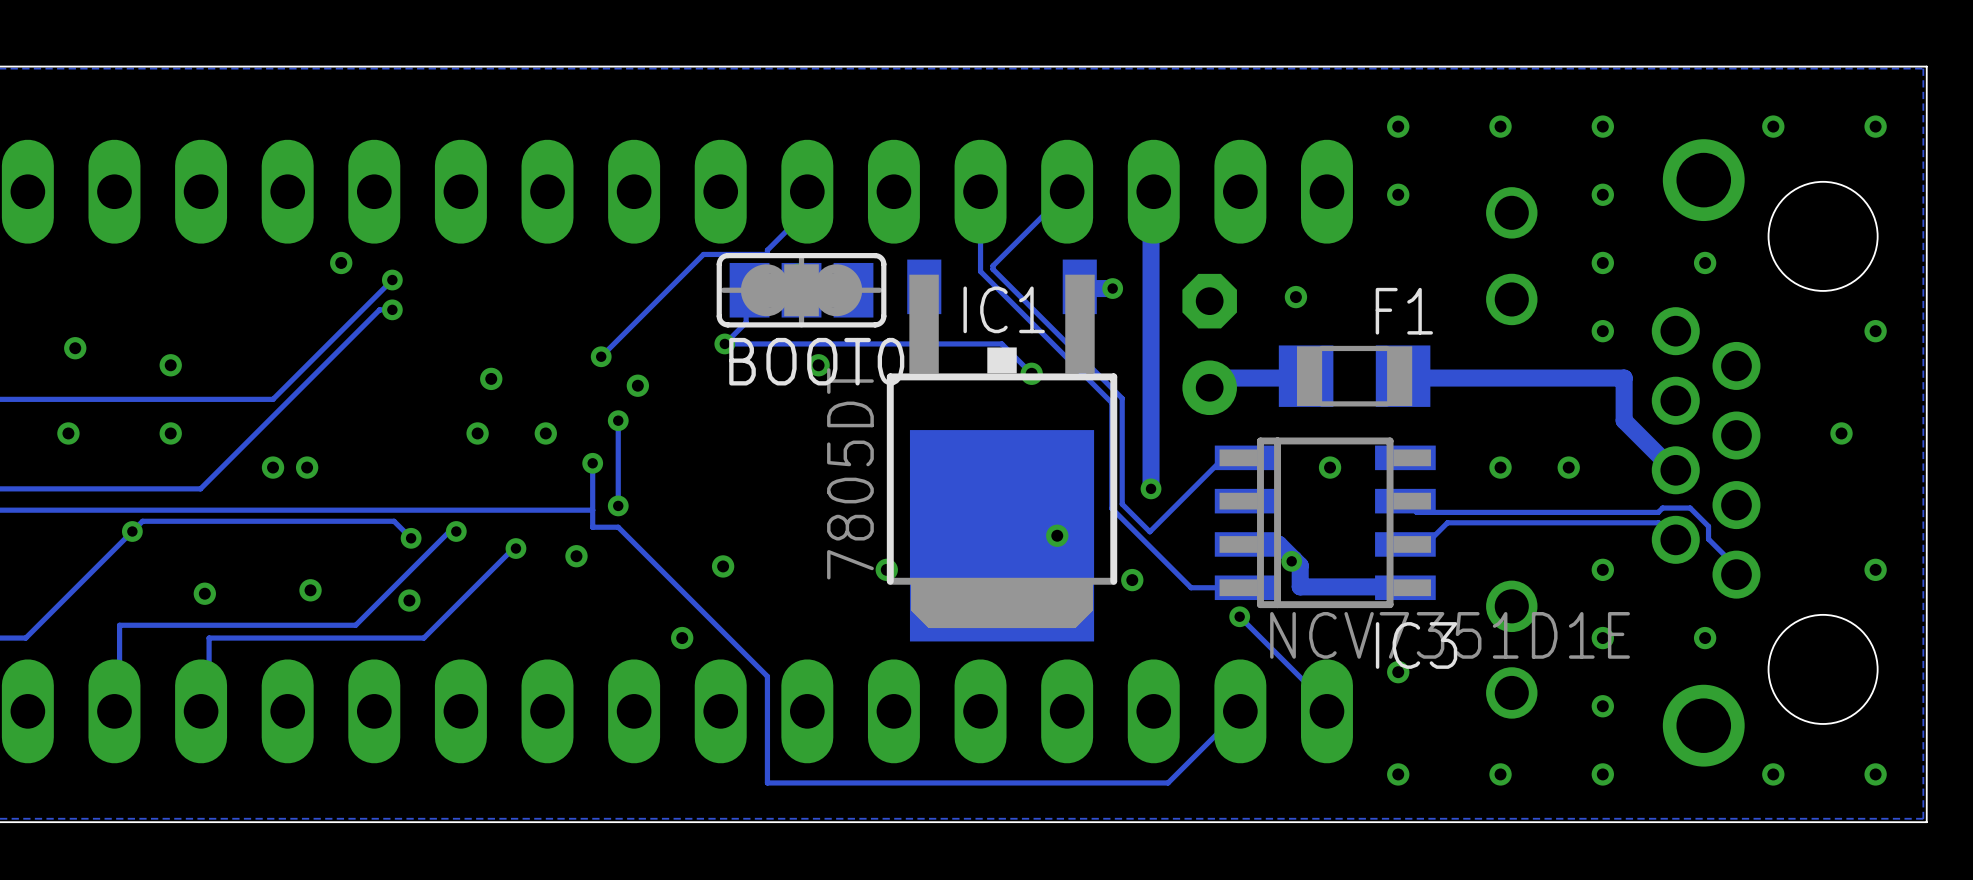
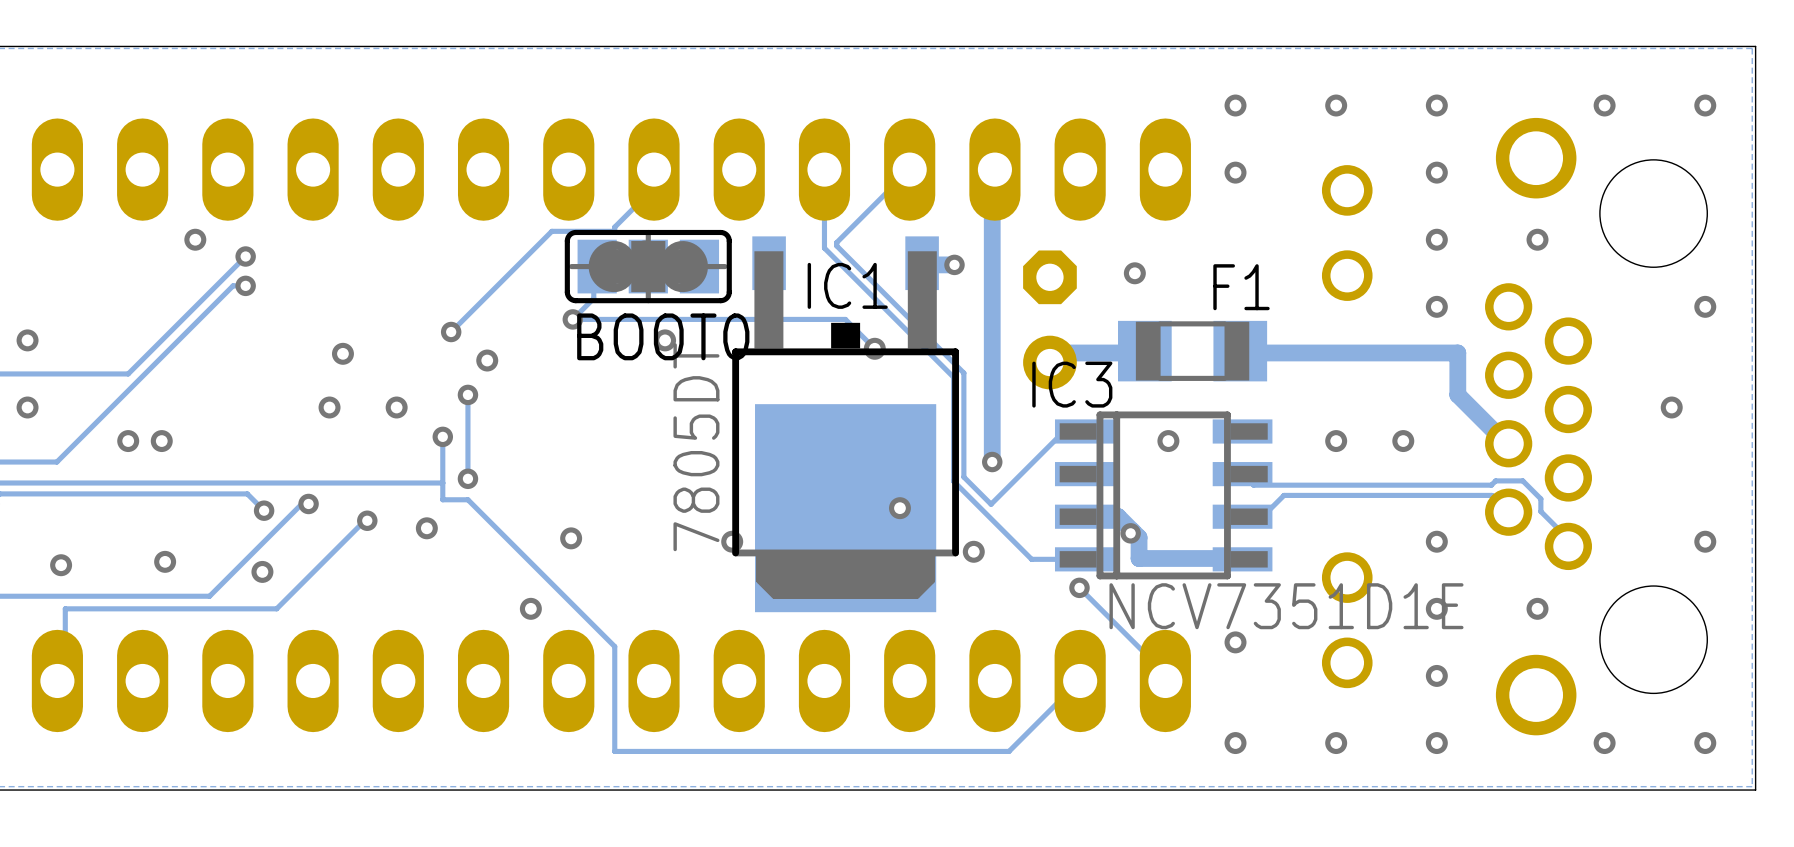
IC3 name position: IC3 (1416, 645) -> IC3 (1072, 384)

